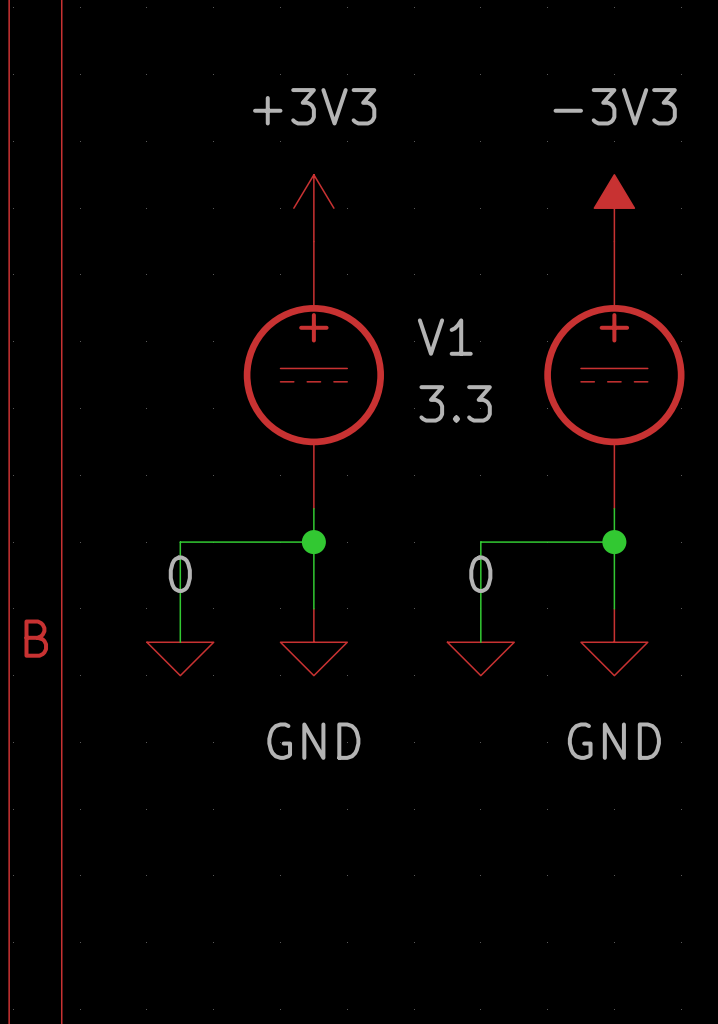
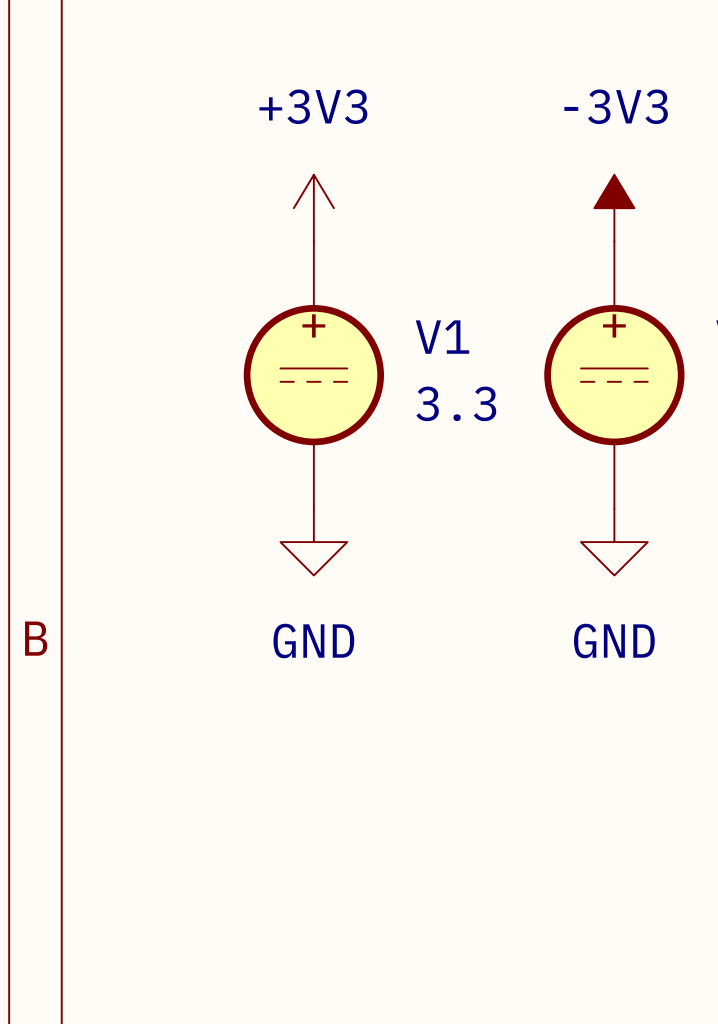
wire: (313, 508) (313, 608) -> none
wire: (614, 508) (614, 608) -> none
wire: (313, 542) (180, 542) (180, 642) -> none
junction: (313, 542) -> none
wire: (614, 542) (480, 542) (480, 642) -> none
junction: (614, 542) -> none
power symbol position: GND (313, 642) -> GND (313, 542)
power symbol position: GND (614, 642) -> GND (614, 542)
power symbol: 0 (180, 658) -> none
power symbol: 0 (480, 658) -> none

